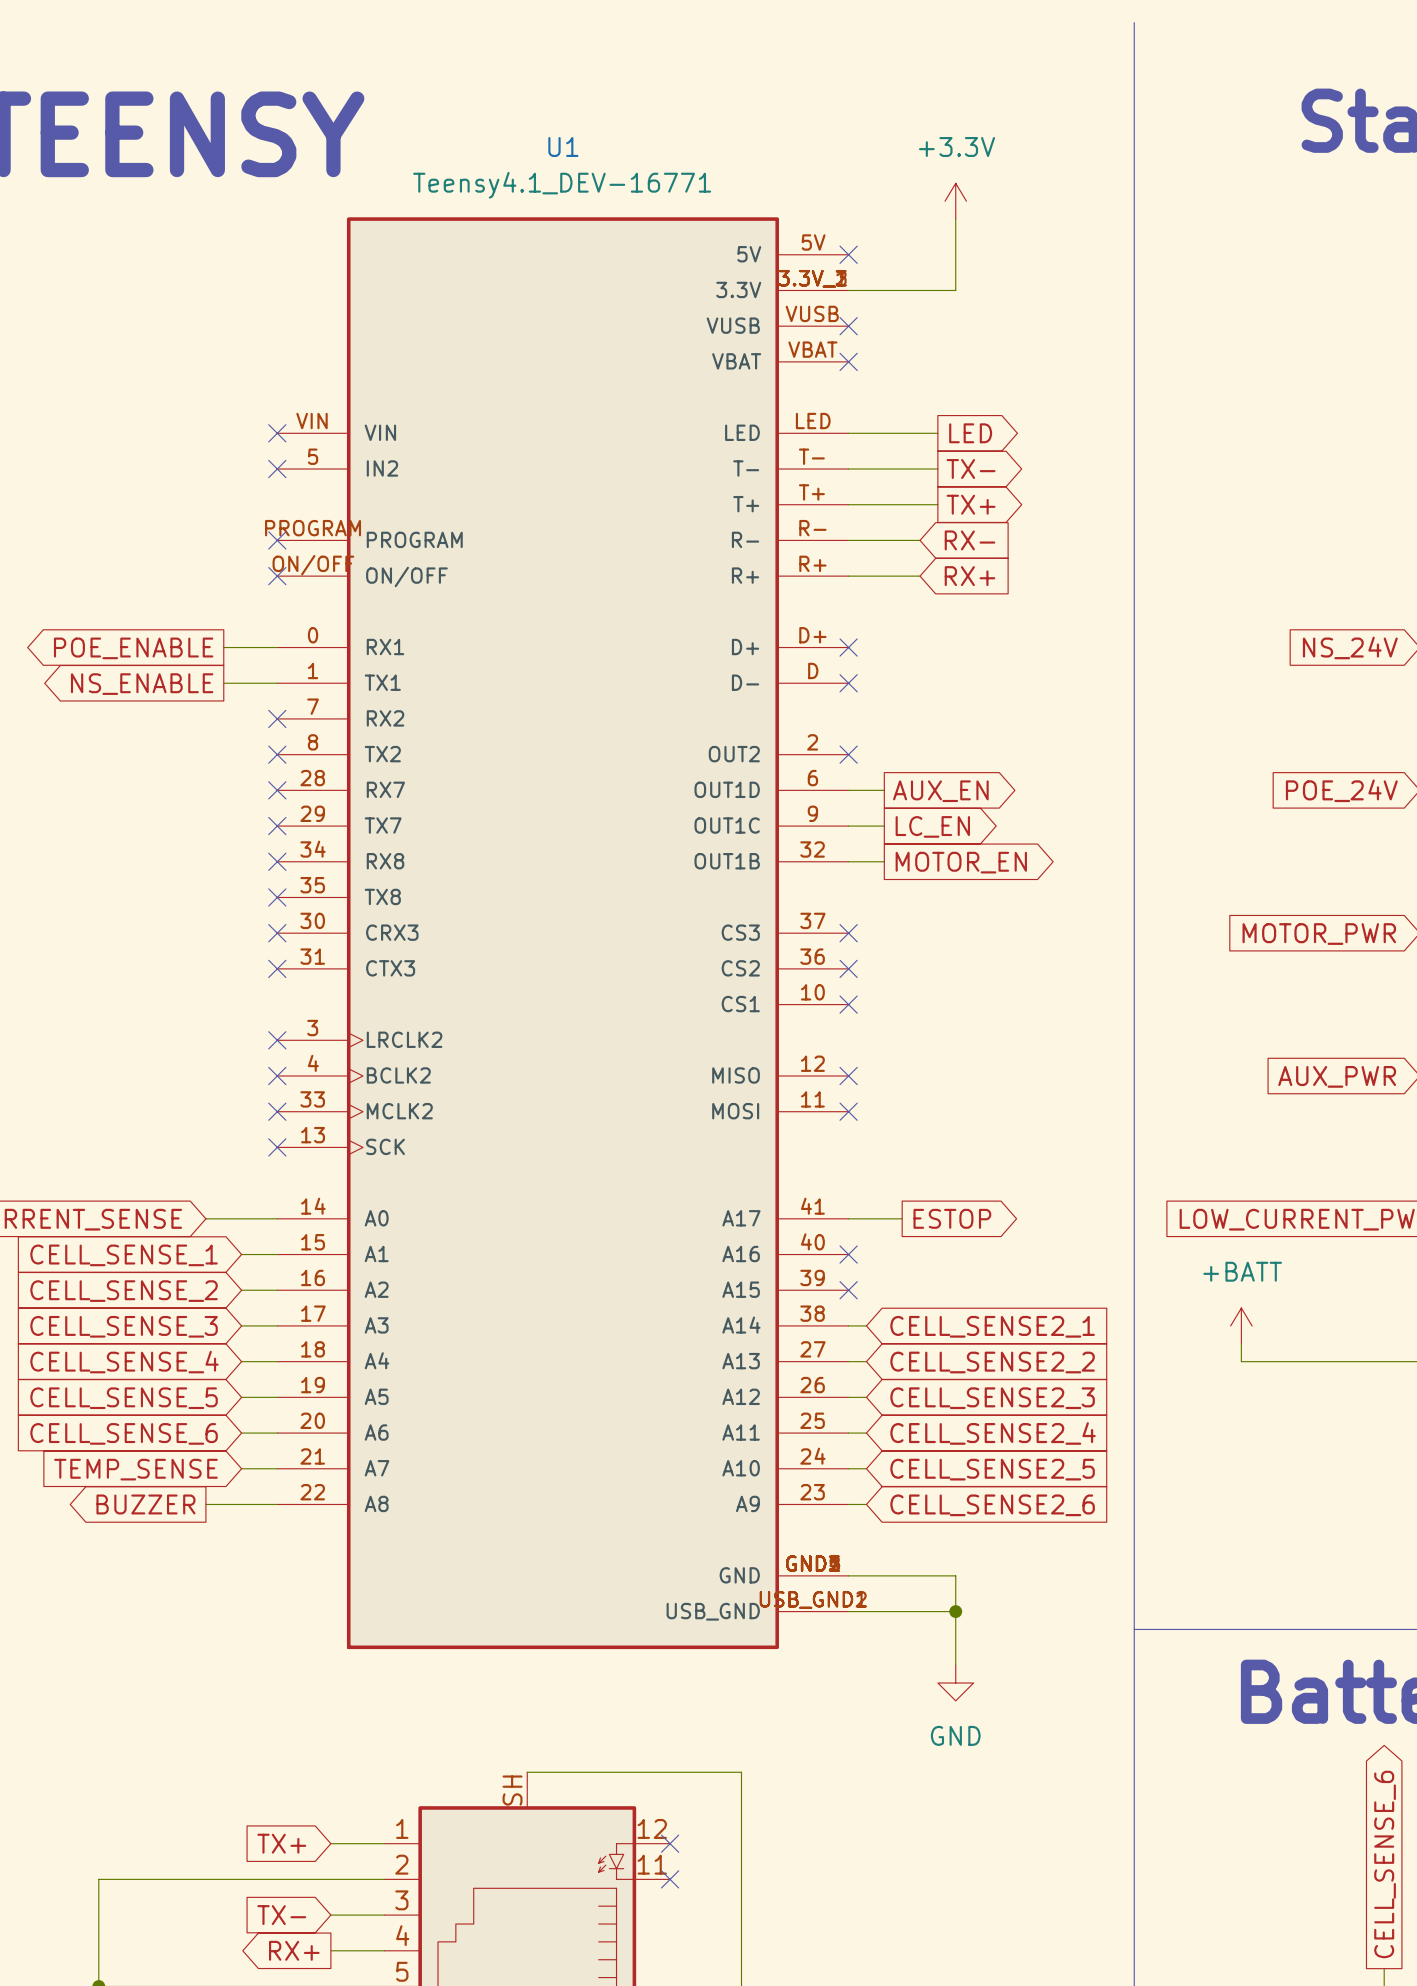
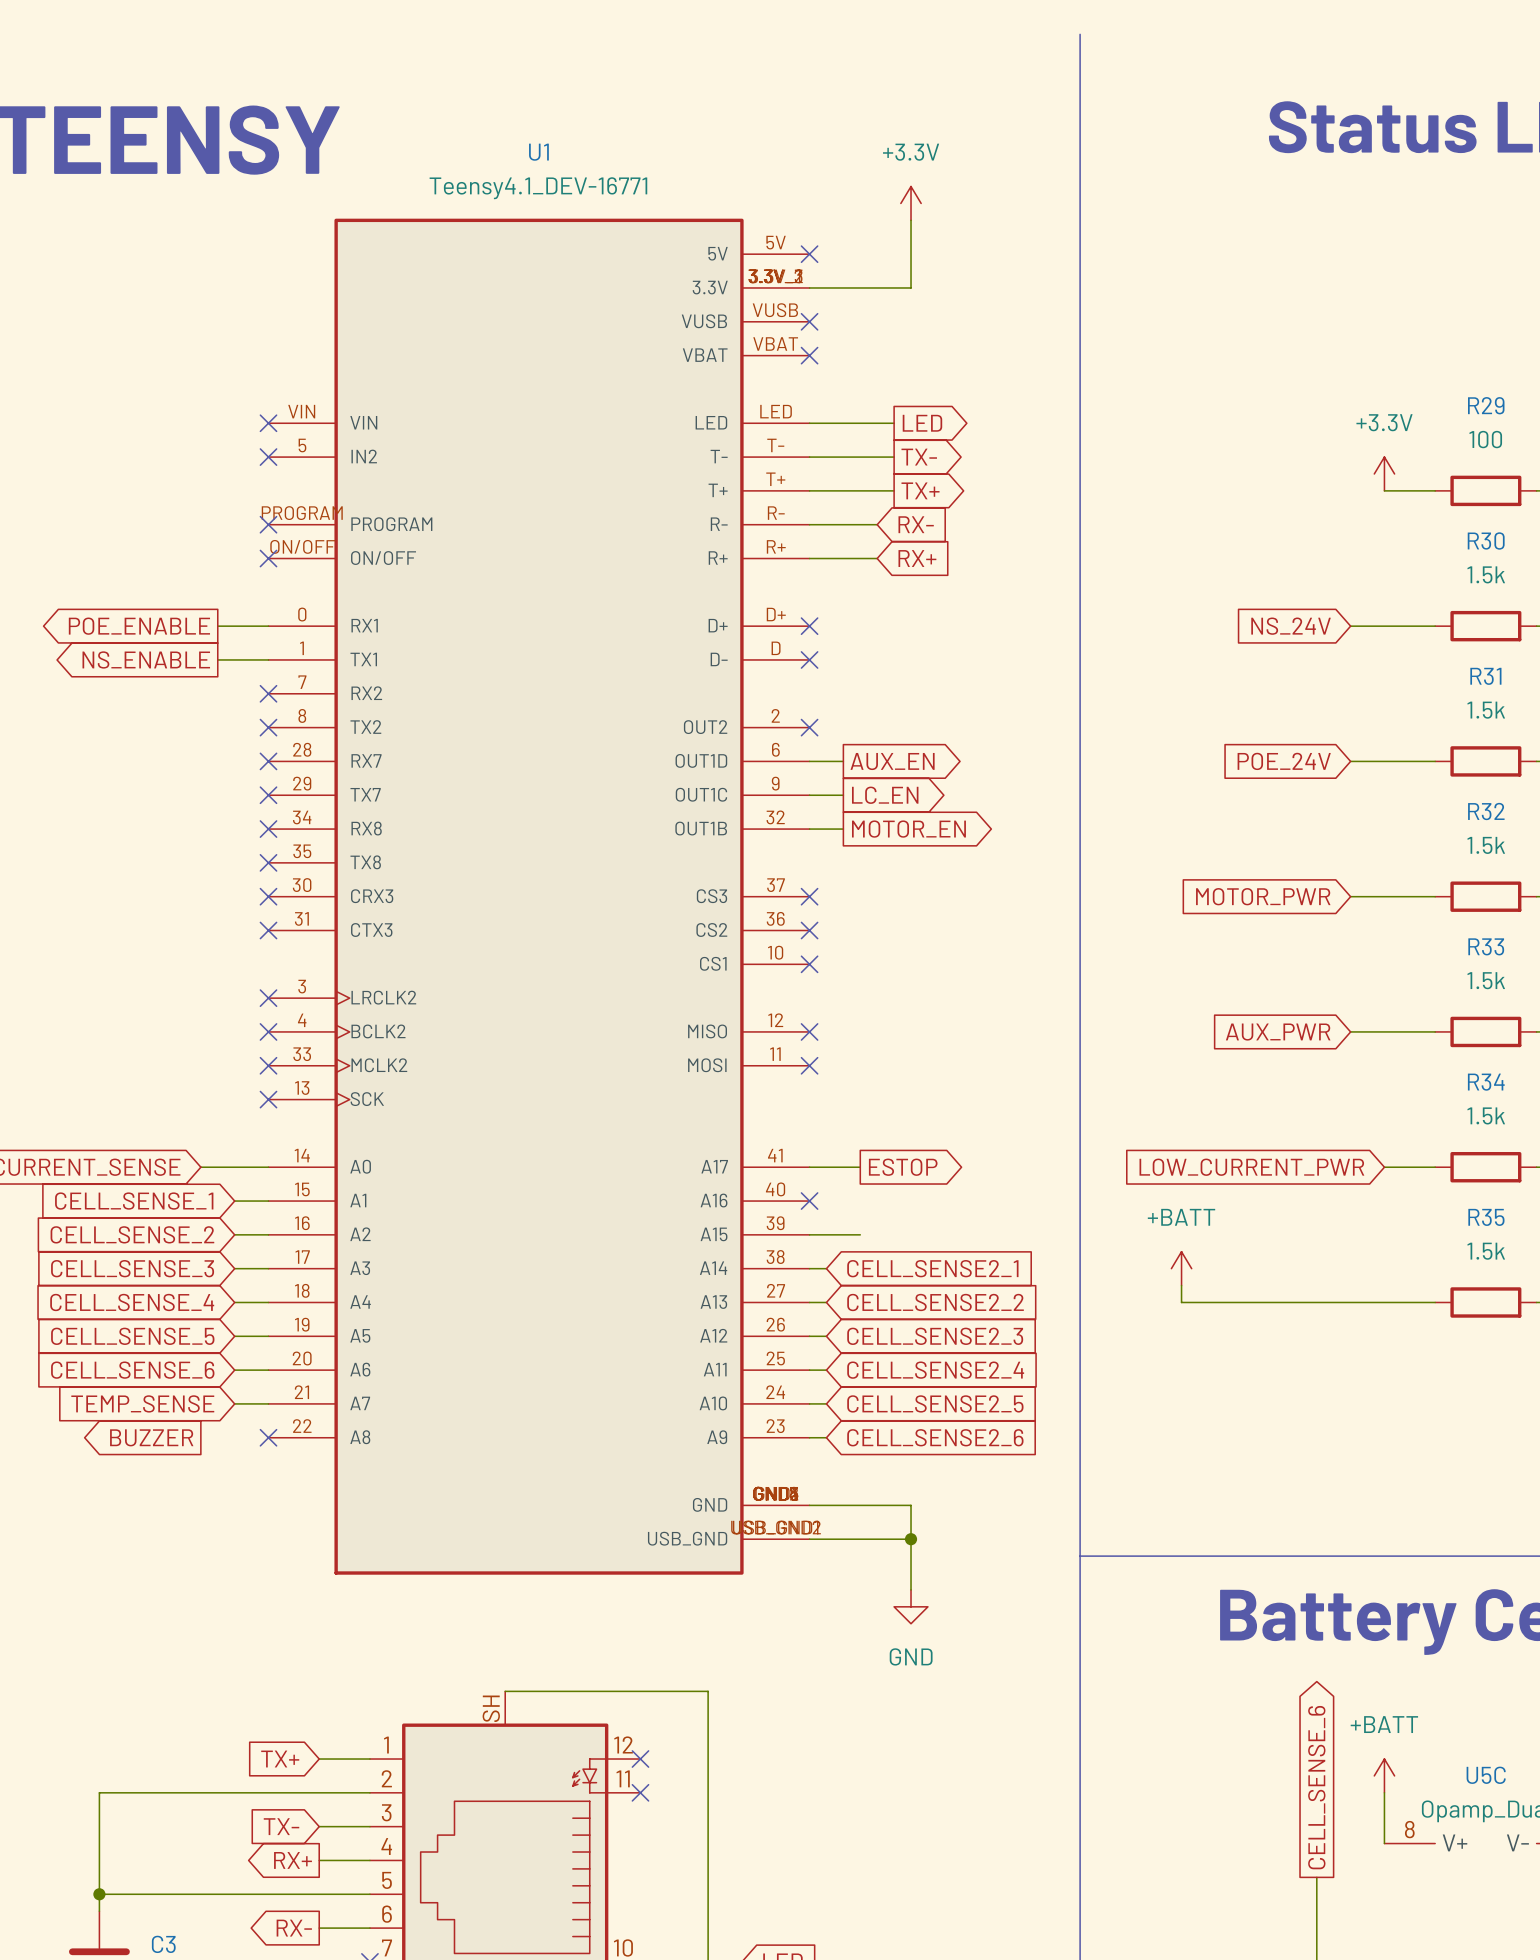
wire: none -> (809, 1234) (860, 1234)
no-connect mark: (848, 1290) -> none
wire: (205, 1504) (277, 1504) -> none
no-connect mark: none -> (268, 1437)

